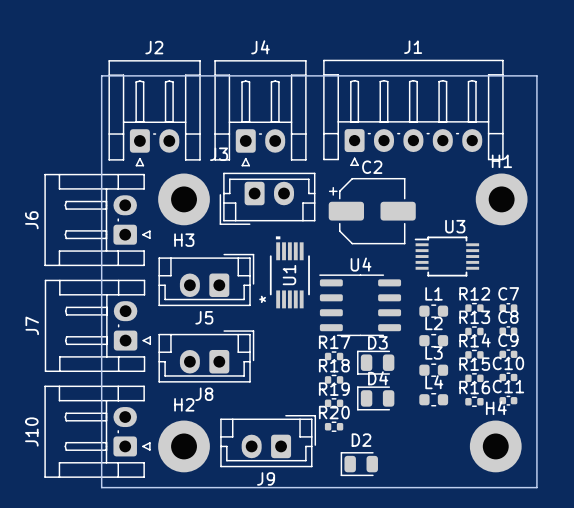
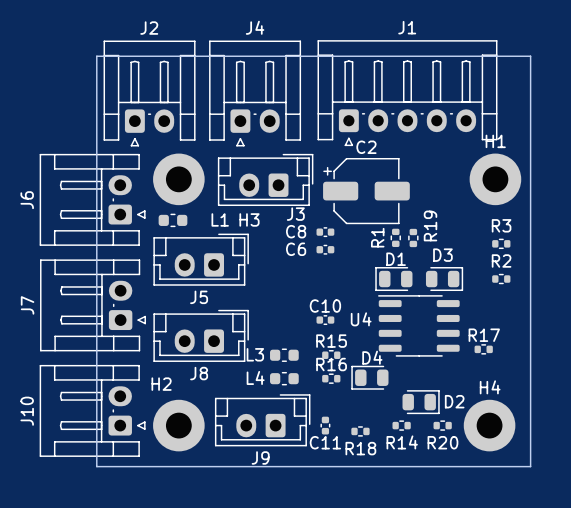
J3 rotation: 0° (267, 198) -> 180° (265, 179)
H3 name position: H3 (184, 240) -> H3 (249, 219)
U3: (446, 256) -> none
R1: none -> (395, 237)
U4 name position: U4 (361, 264) -> U4 (361, 319)
R3: none -> (501, 243)
C6: none -> (325, 249)
U1: (289, 272) -> none
L1 name position: L1 (433, 293) -> L1 (220, 219)
D1: none -> (393, 279)
R2: none -> (501, 279)
U4 position: (360, 305) -> (418, 325)
C7: (508, 307) -> none
R12: (474, 308) -> none
L1 position: (433, 311) -> (172, 220)
C8 name position: C8 (508, 317) -> C8 (296, 231)
R13: (474, 331) -> none
C8 position: (508, 331) -> (325, 232)
L2: (433, 340) -> none
R14 name position: R14 (474, 340) -> R14 (402, 442)
L3 name position: L3 (433, 352) -> L3 (255, 354)
R14 position: (474, 354) -> (401, 425)
C9: (508, 354) -> none
R17 position: (334, 356) -> (483, 349)
D3 rotation: 0° (375, 362) -> 180° (444, 279)
D3 position: (375, 362) -> (444, 279)
R18 name position: R18 (334, 365) -> R18 (360, 448)
L3 position: (433, 370) -> (284, 355)
C10 position: (508, 377) -> (325, 320)
R15 position: (474, 378) -> (331, 355)
R18 position: (334, 379) -> (360, 431)
L4 name position: L4 (434, 382) -> L4 (255, 377)
L4 position: (433, 399) -> (284, 378)
C11 rotation: 0° (508, 400) -> 90° clockwise (325, 425)
C11 position: (508, 400) -> (325, 425)
R16 position: (474, 401) -> (331, 378)
R19 rotation: 0° (334, 403) -> 90° clockwise (413, 237)
R19 position: (334, 403) -> (413, 237)
H2 name position: H2 (184, 404) -> H2 (161, 384)
R20 name position: R20 (334, 412) -> R20 (442, 442)
R20 position: (334, 426) -> (442, 425)
D2 name position: D2 (361, 440) -> D2 (454, 401)
D2 rotation: 0° (359, 464) -> 180° (421, 402)
D2 position: (359, 464) -> (421, 402)

